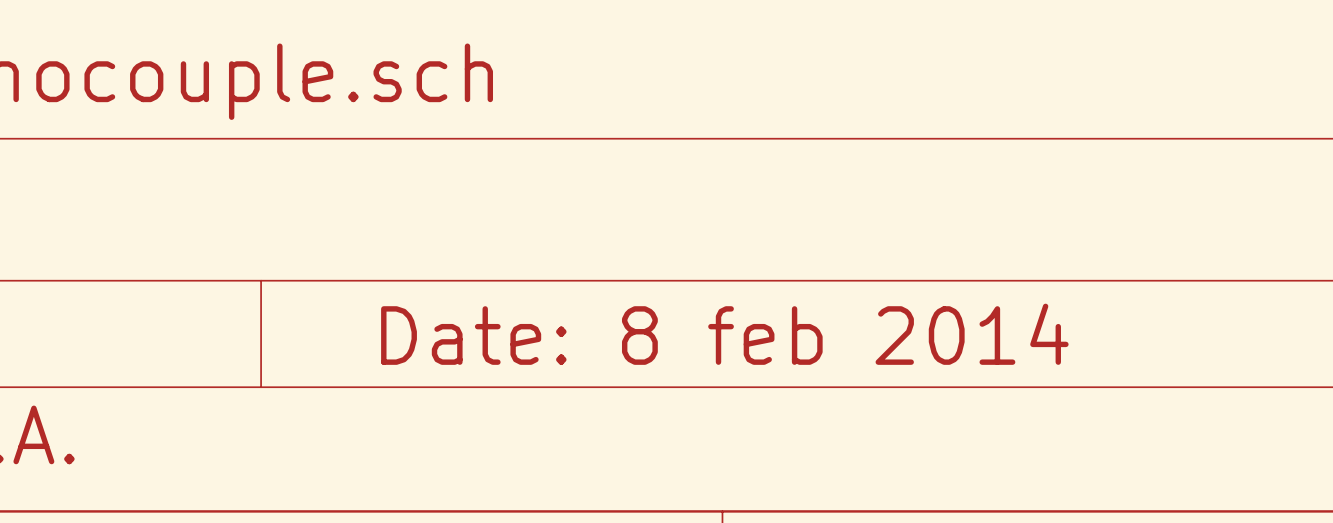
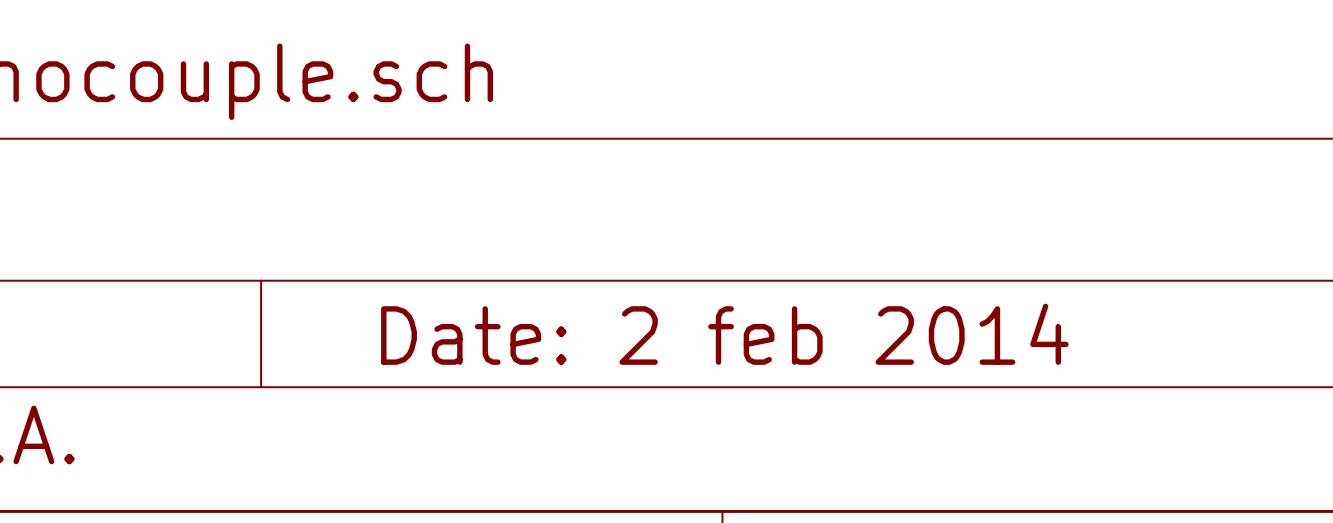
title block: Date: 8 feb 2014 (724, 334) -> Date: 2 feb 2014 (724, 334)

